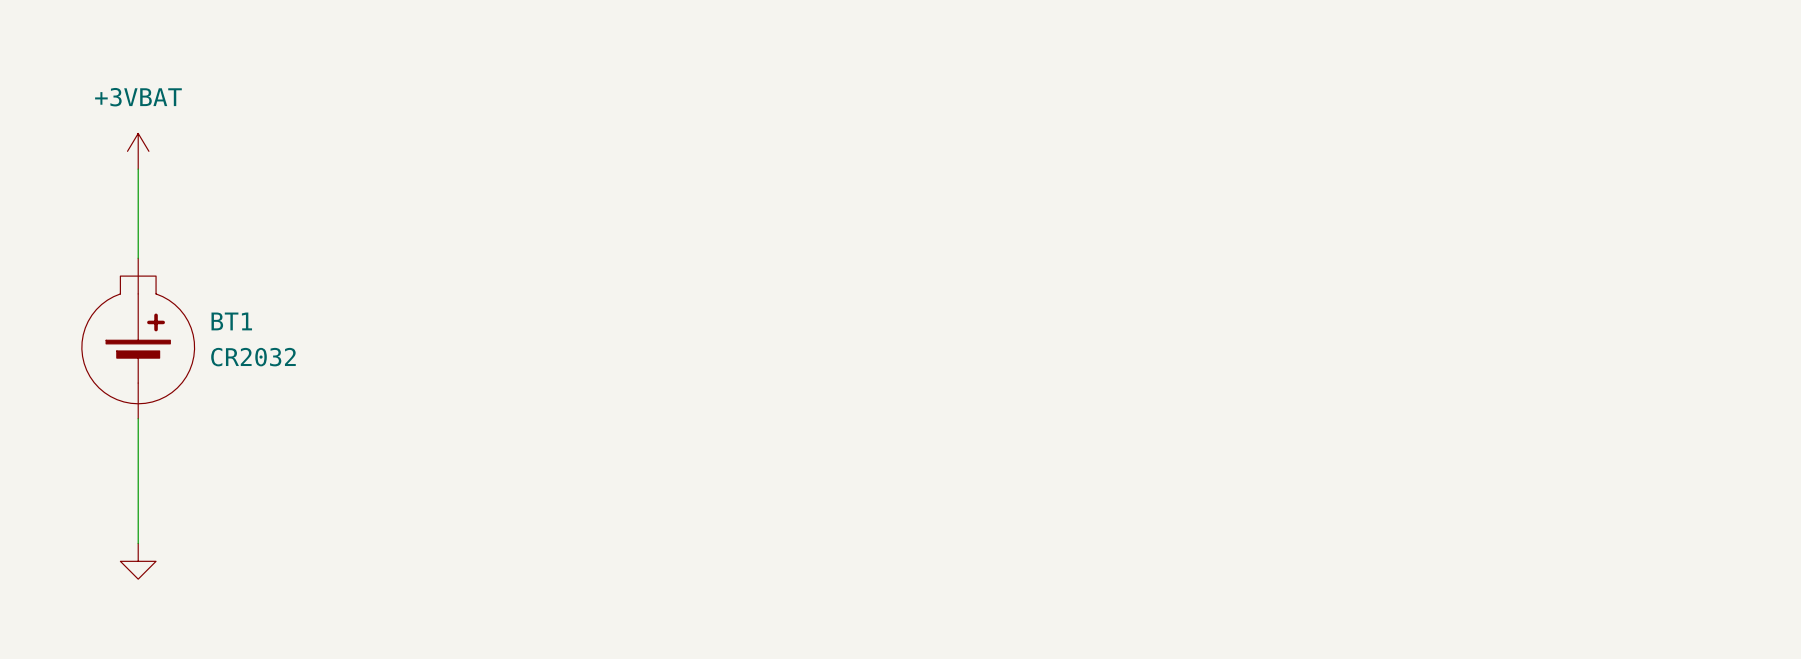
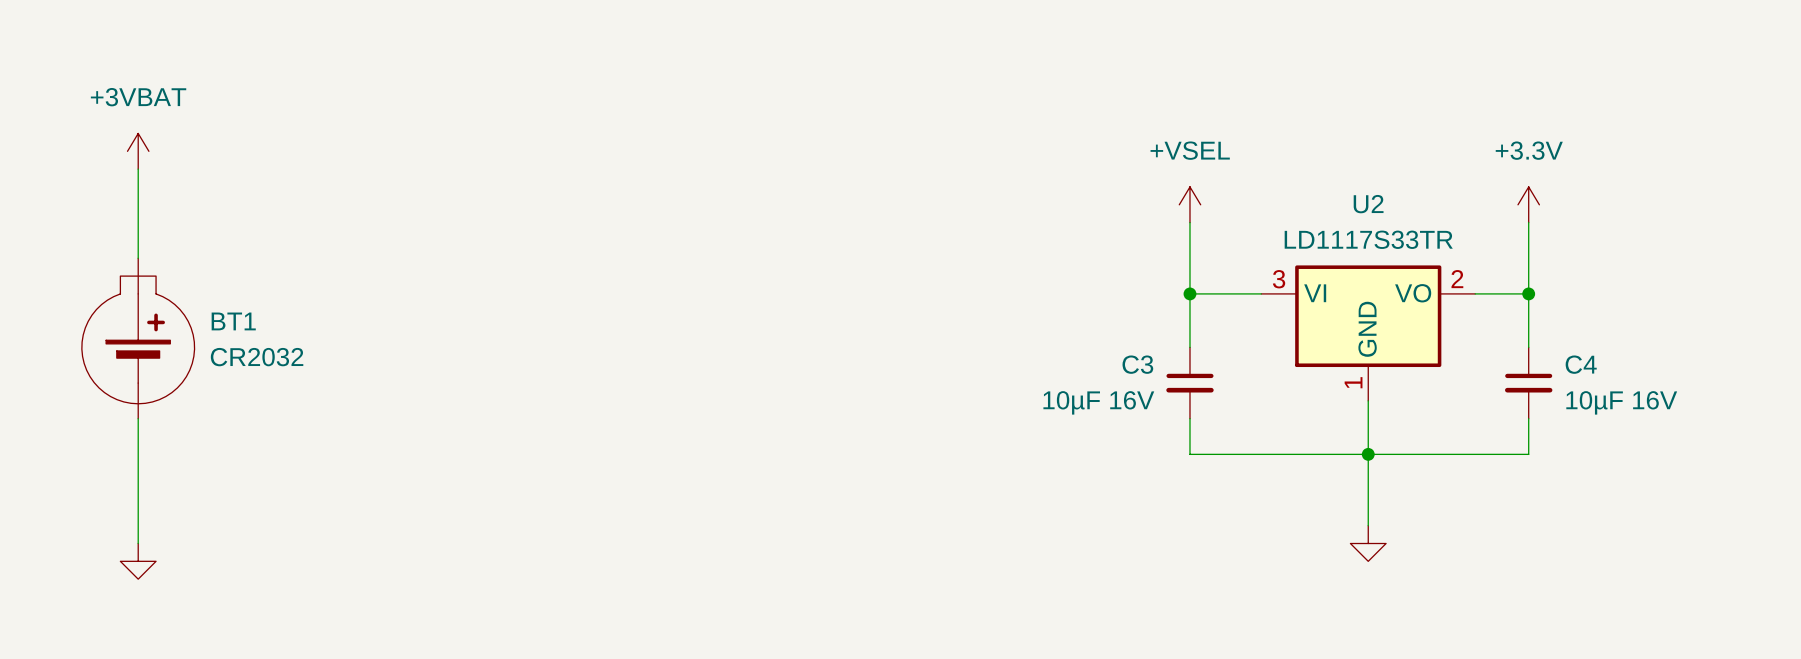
power symbol: none -> +VSEL (1189, 204)
power symbol: none -> +3.3V (1528, 204)
wire: none -> (1189, 222) (1189, 347)
wire: none -> (1528, 222) (1528, 347)
wire: none -> (1189, 293) (1261, 293)
junction: none -> (1189, 293)
wire: none -> (1475, 293) (1528, 293)
junction: none -> (1528, 293)
U2: none -> LD1117S33TR (1368, 333)
C3: none -> 10µF 16V (1189, 383)
C4: none -> 10µF 16V (1528, 383)
wire: none -> (1368, 400) (1368, 525)
wire: none -> (1189, 418) (1189, 454) (1528, 454) (1528, 418)
junction: none -> (1368, 454)
power symbol: none -> (1368, 543)

